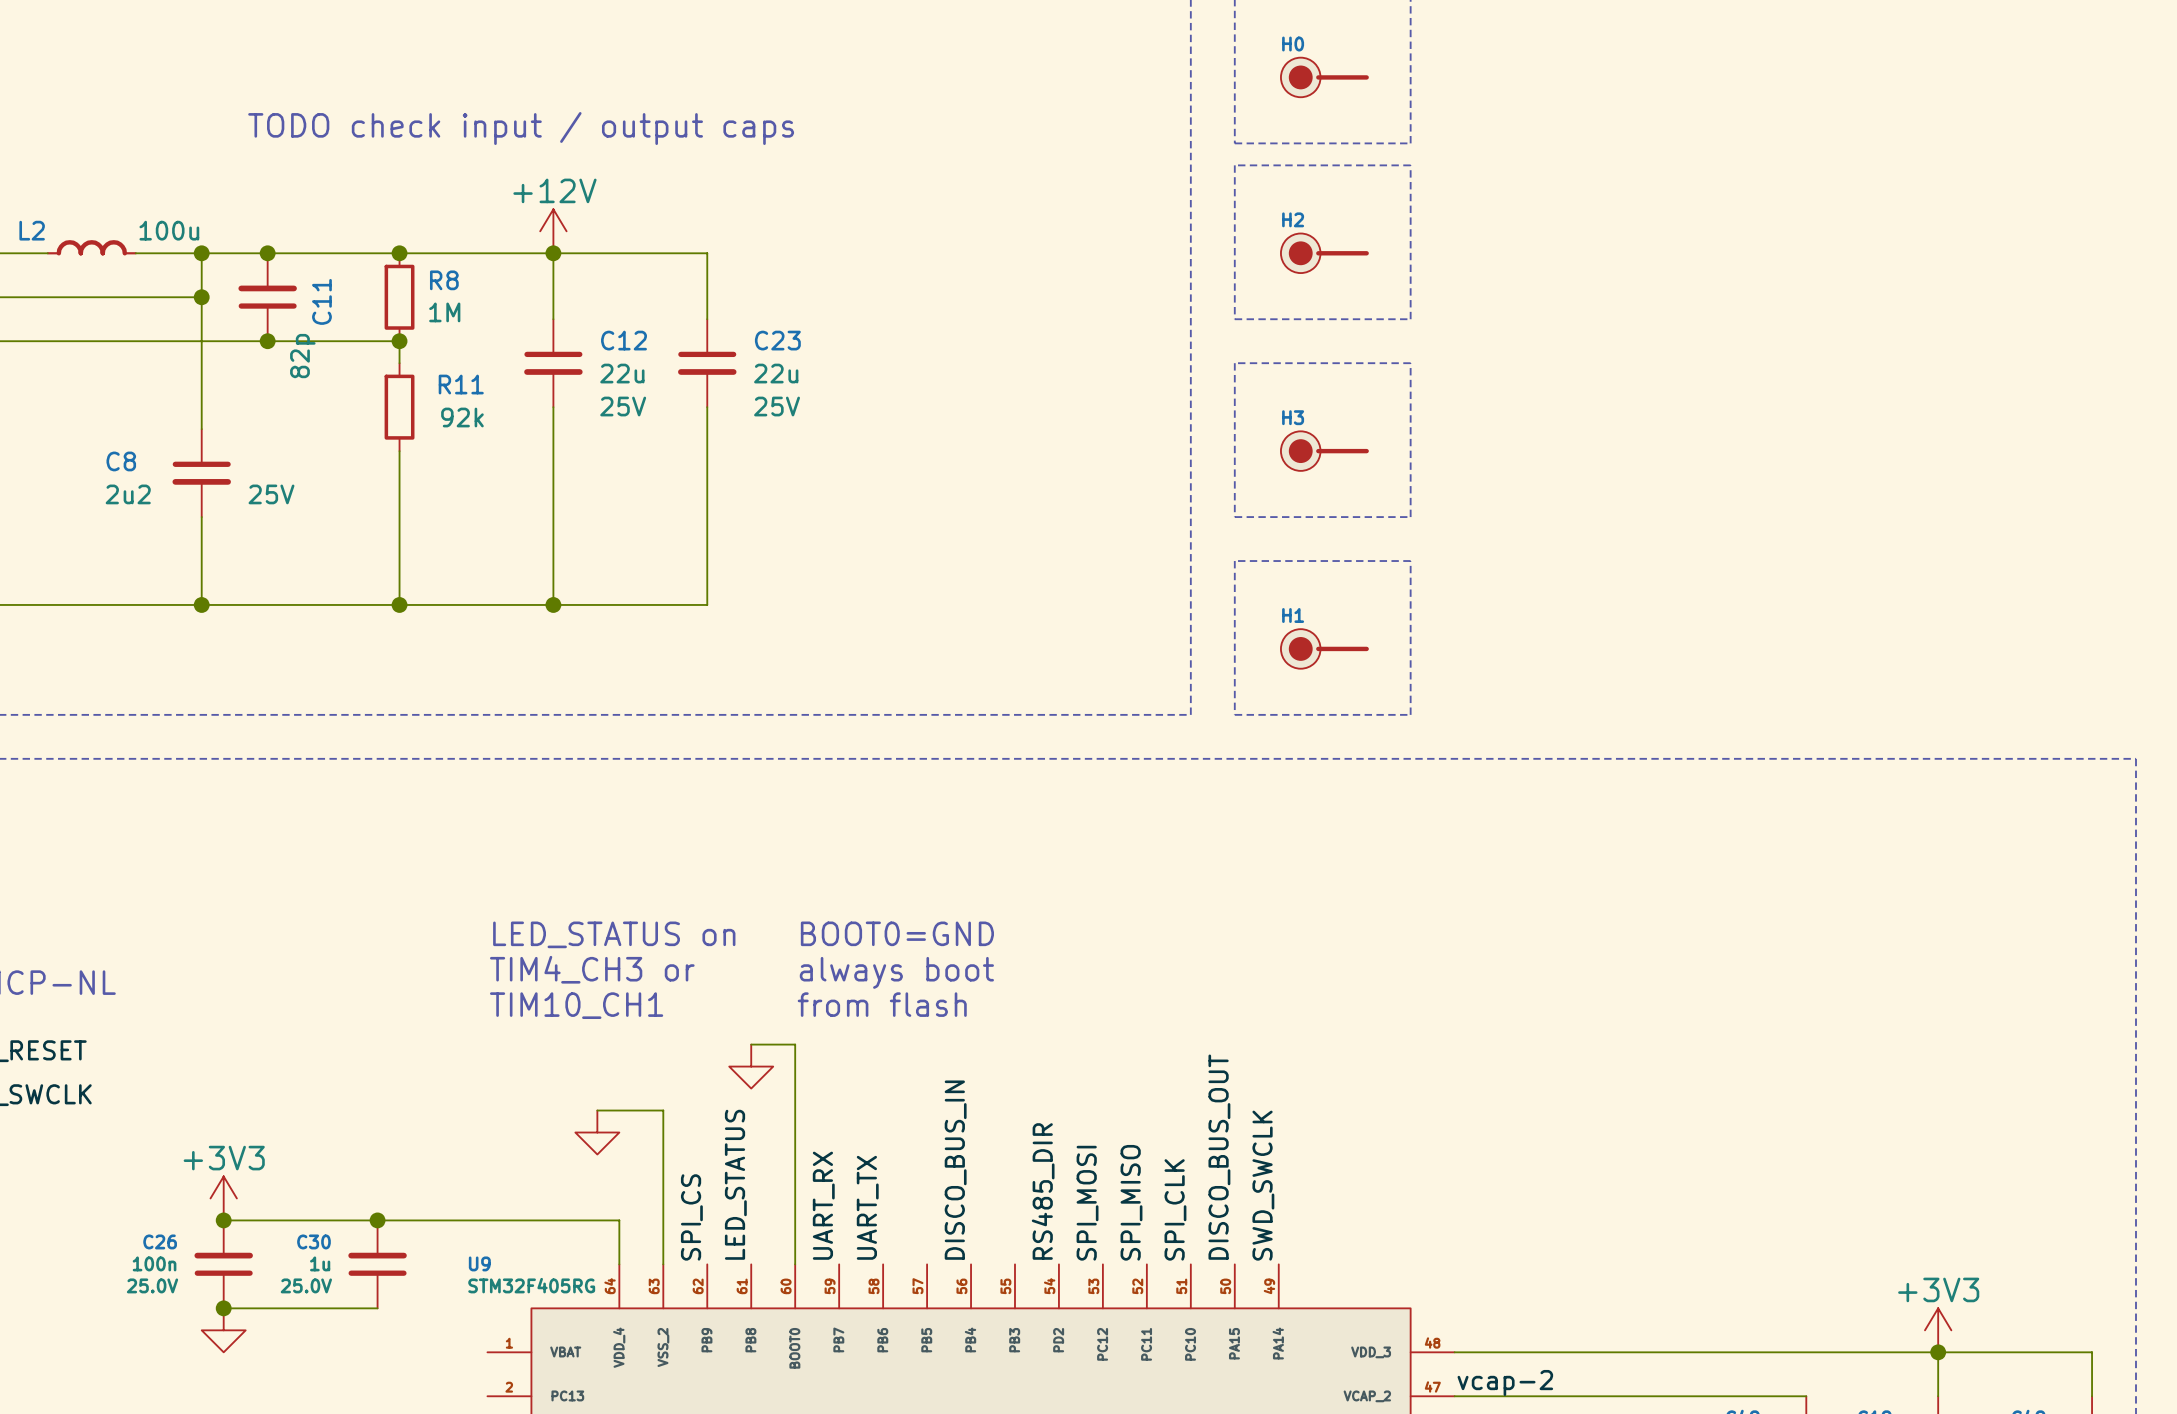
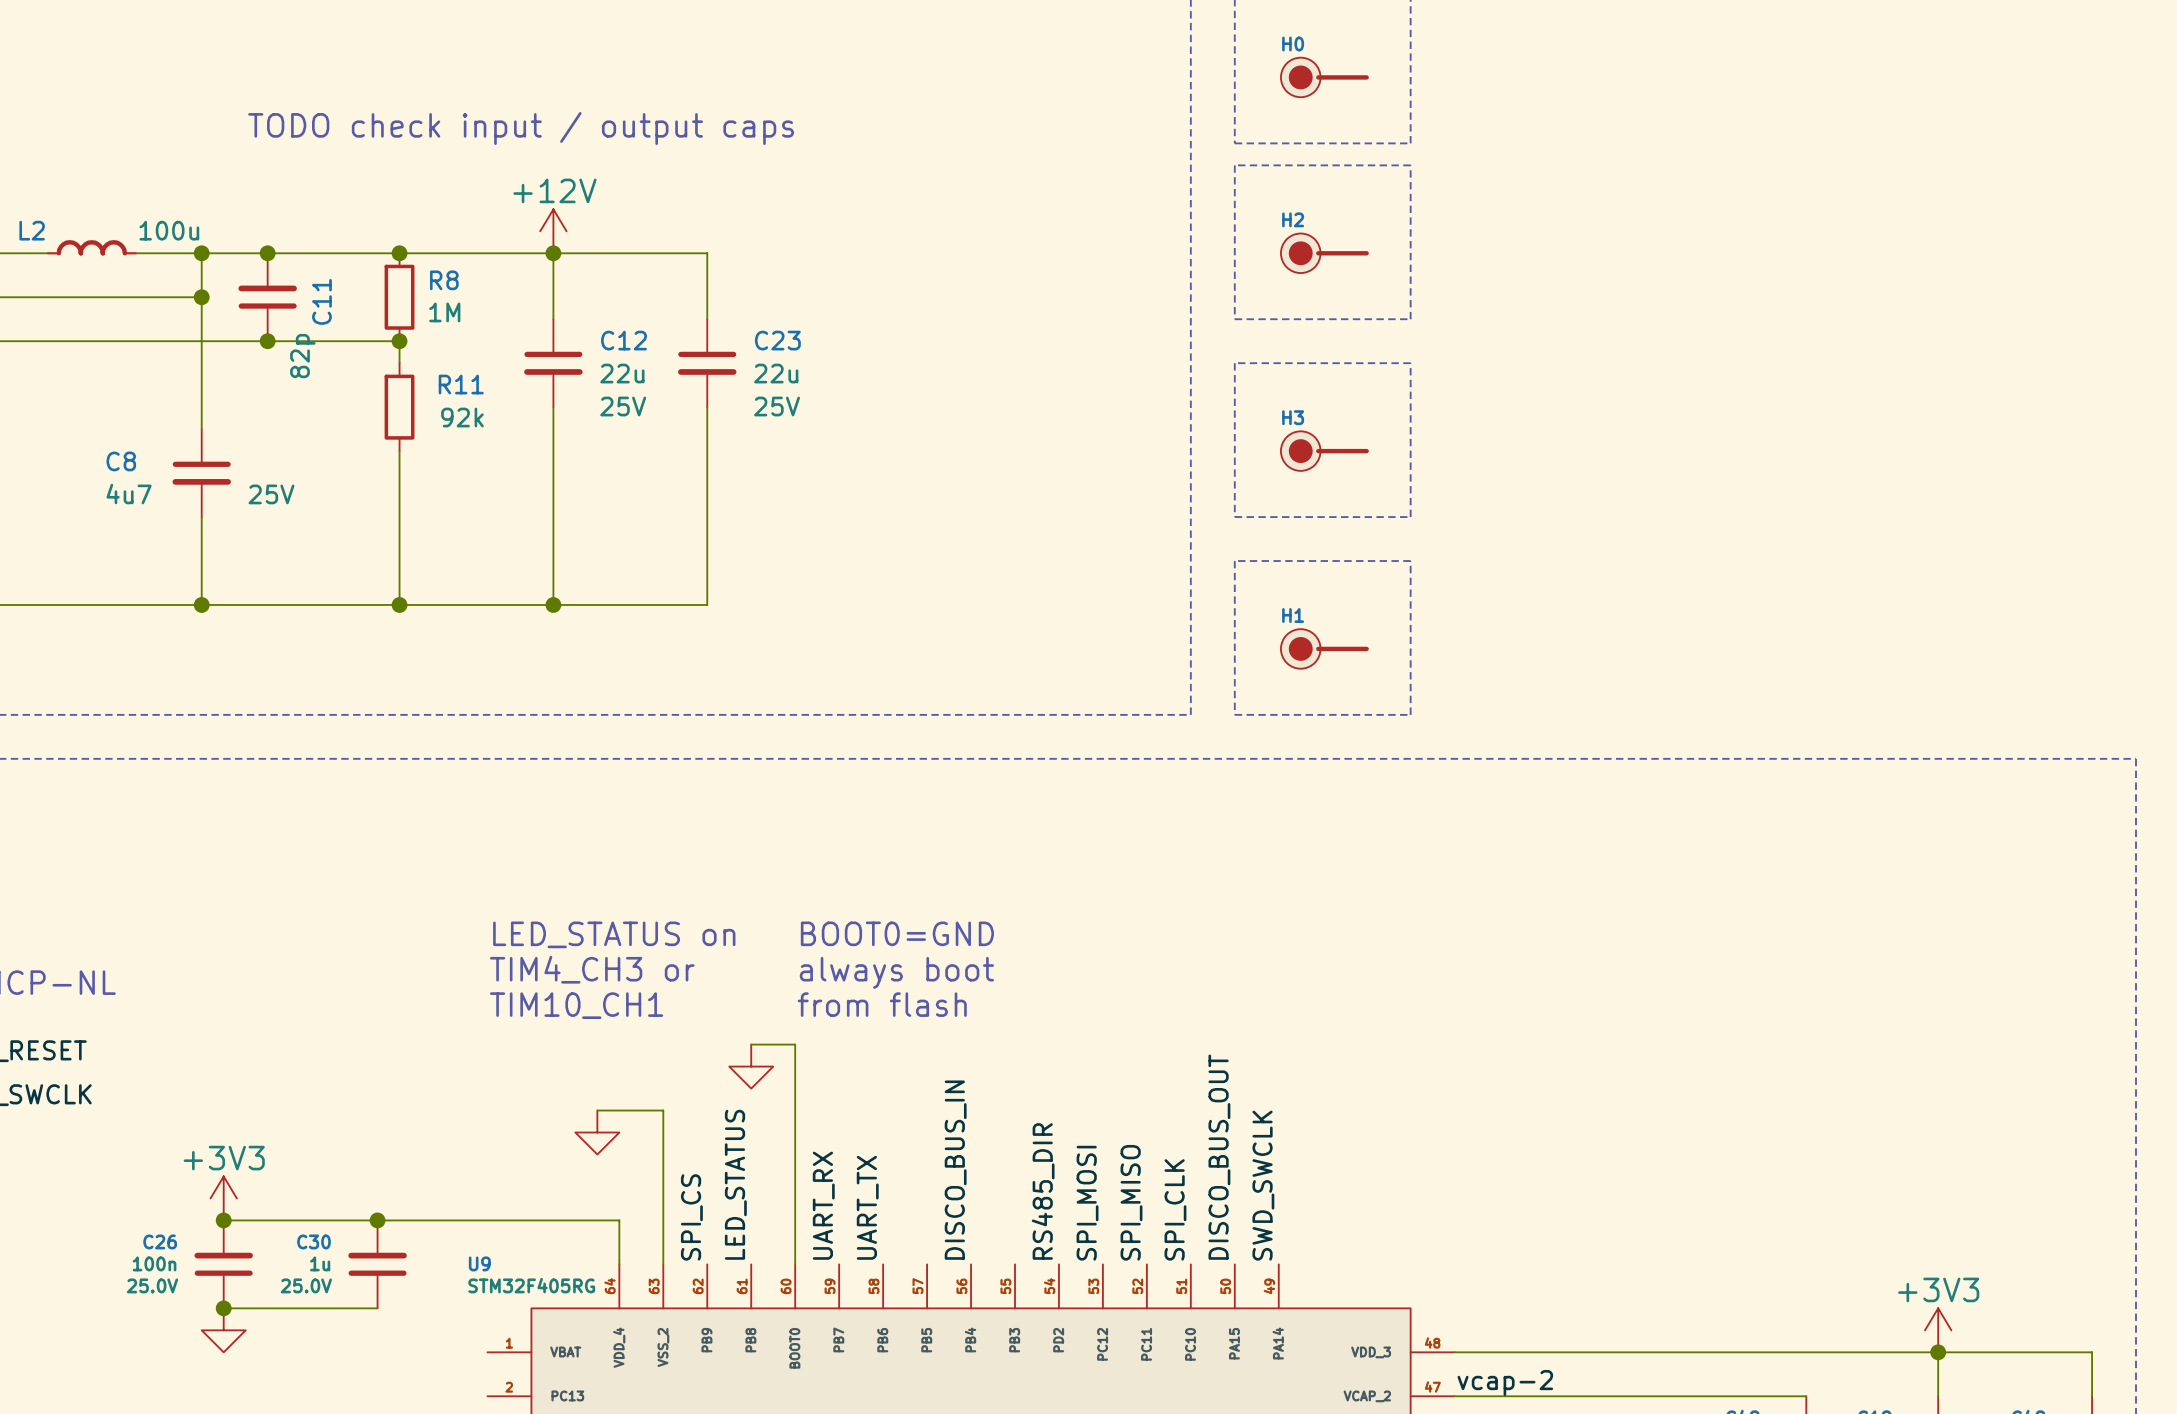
C8 value: 2u2 (128, 494) -> 4u7 (129, 494)

